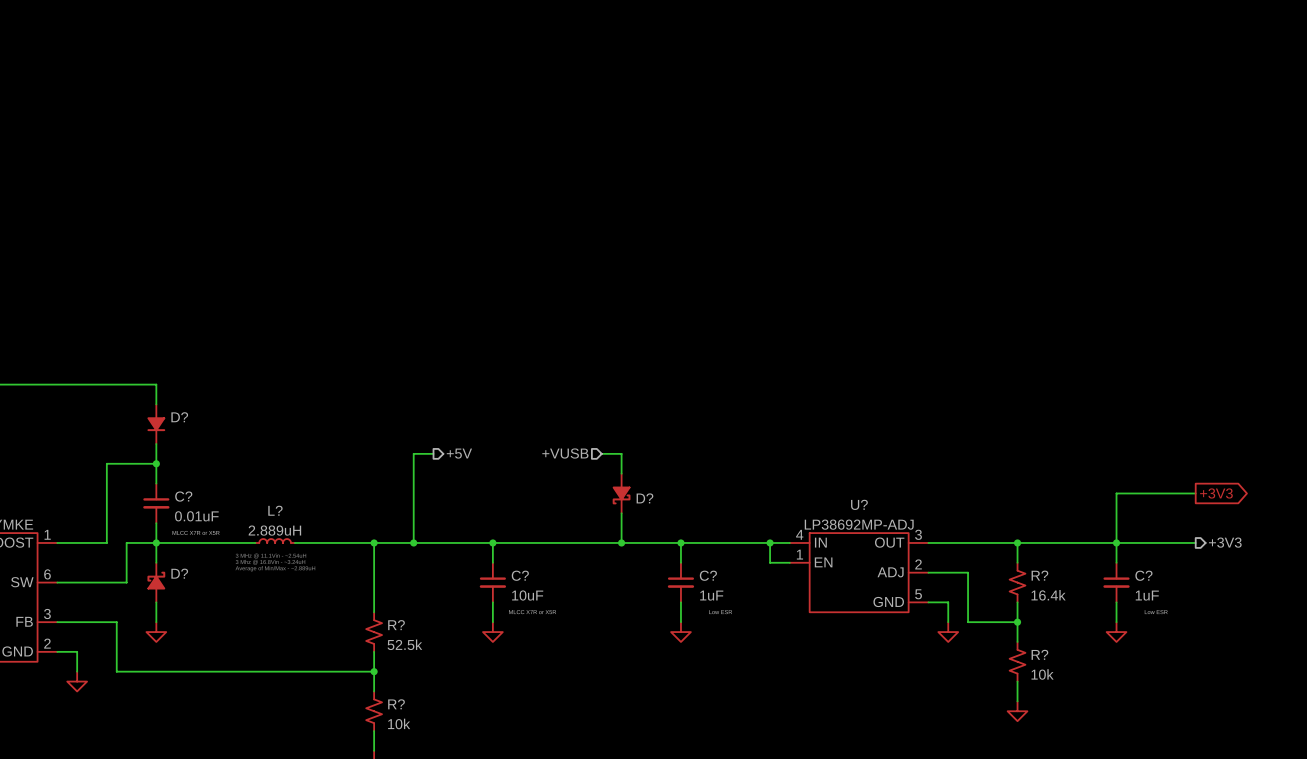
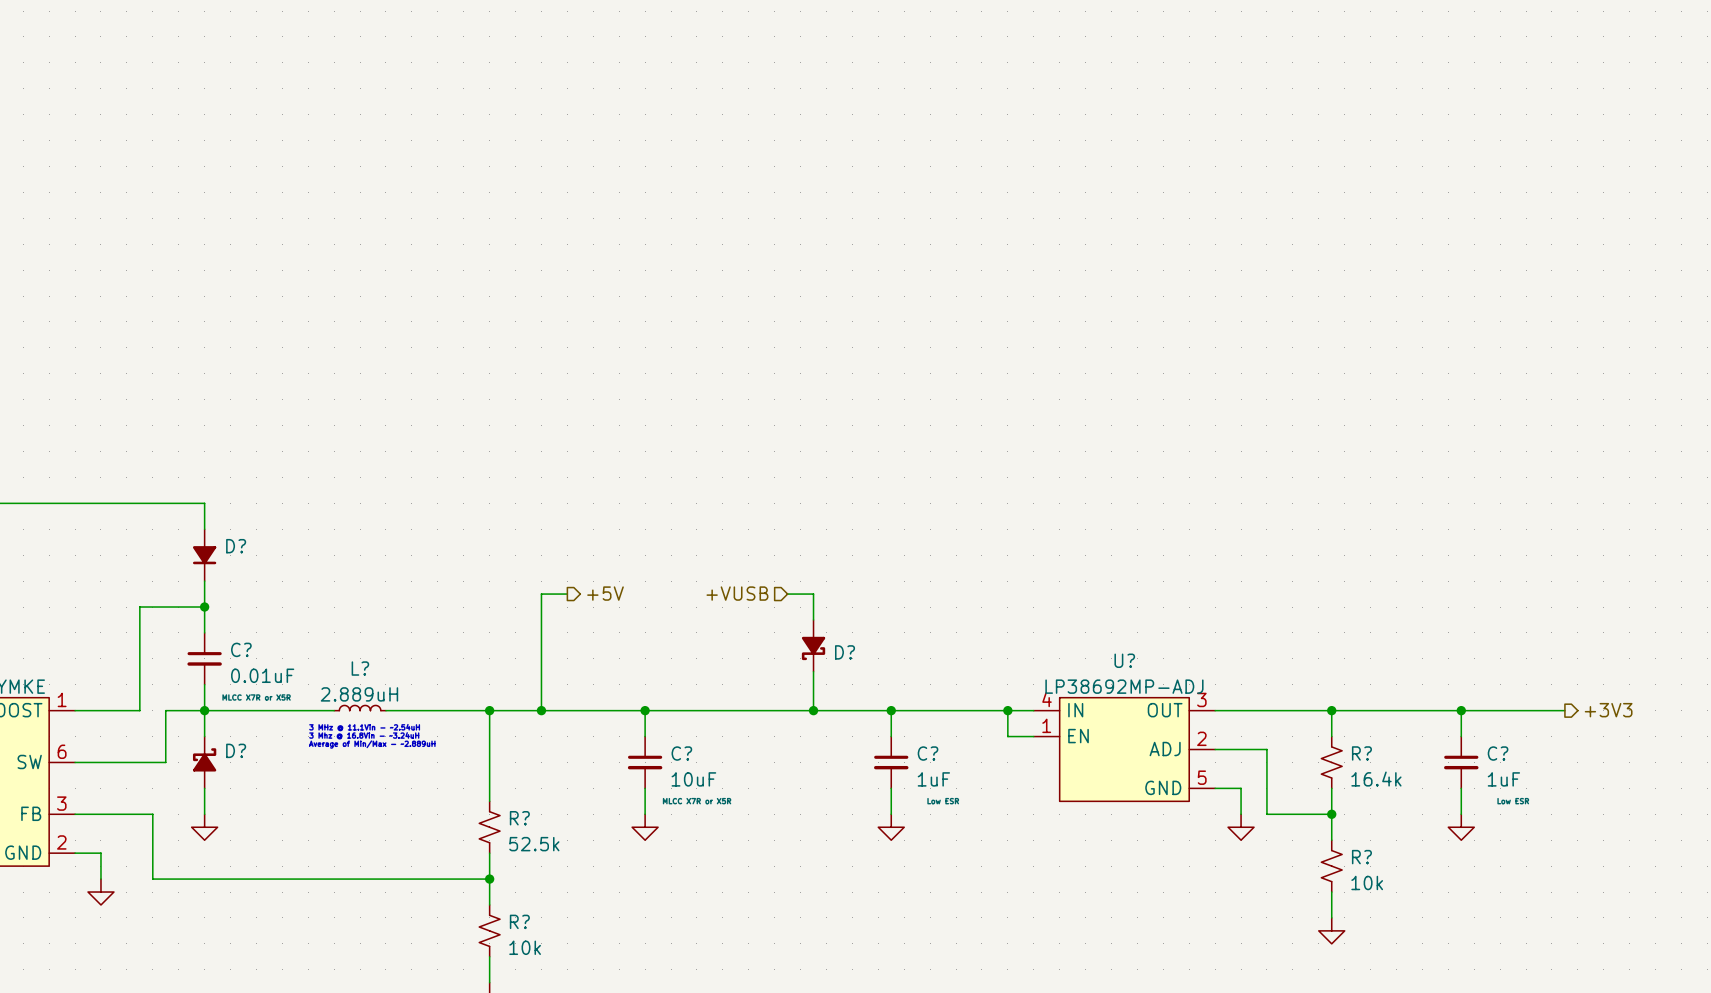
wire: (1195, 493) (1116, 493) (1116, 542) -> none
global label: +3V3 (1216, 493) -> none

